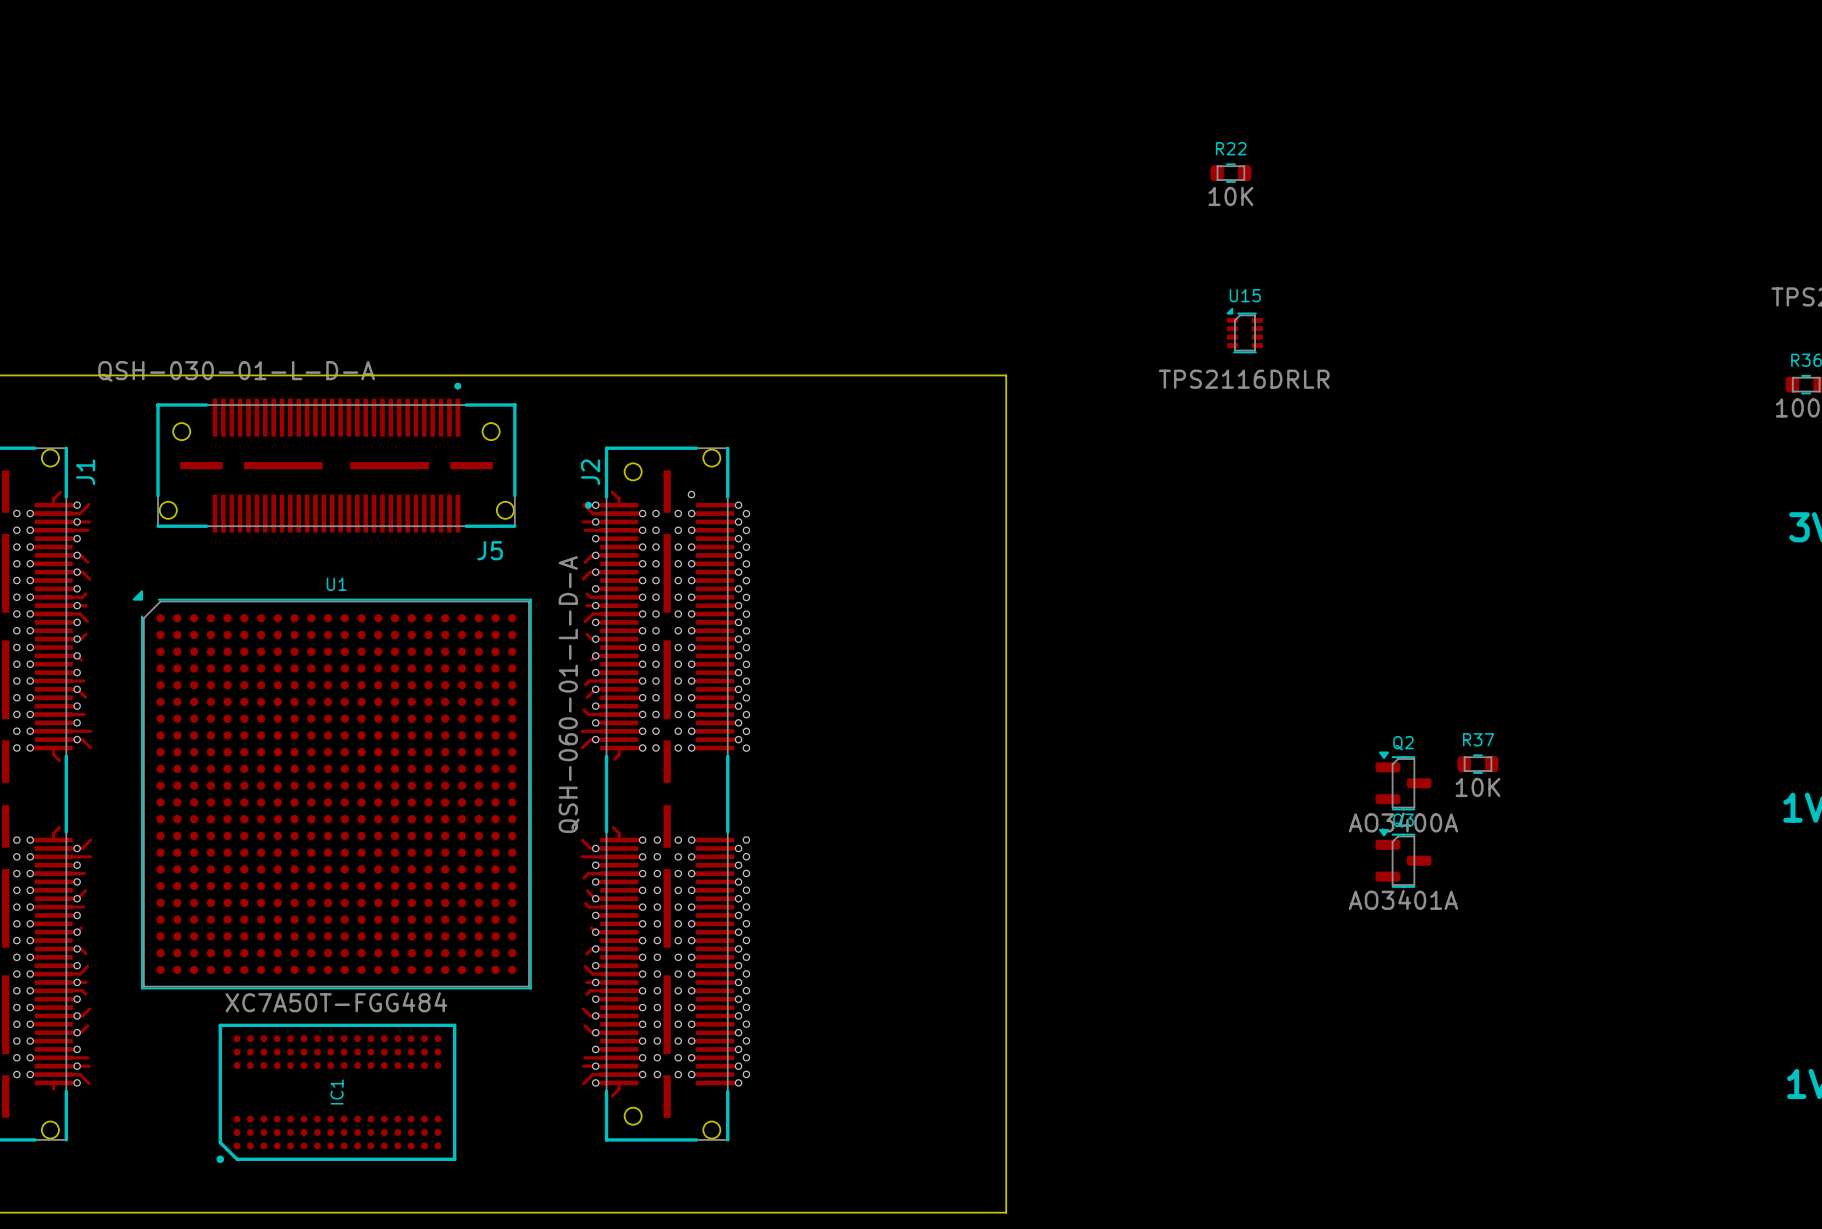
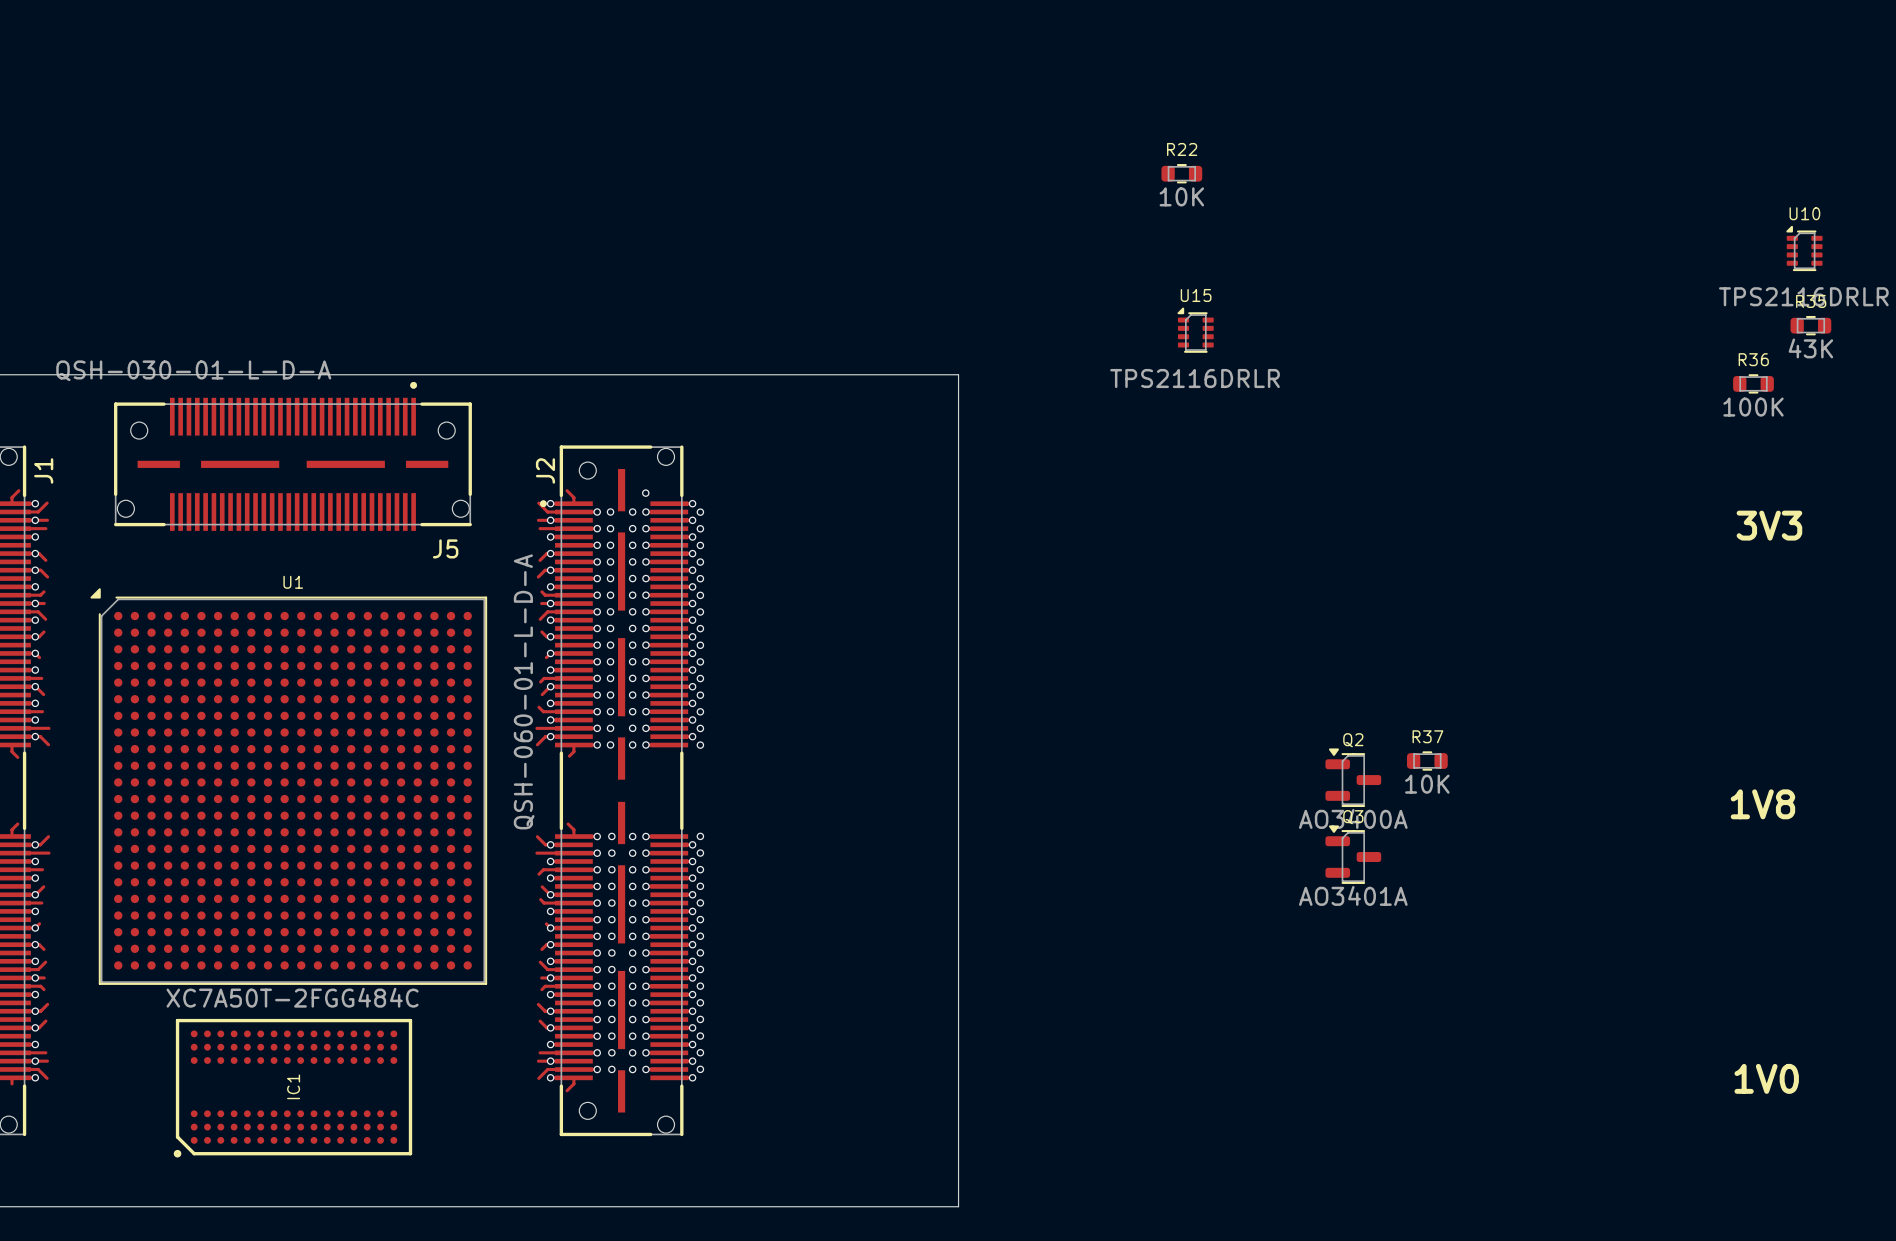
U1 value: XC7A50T-FGG484 (336, 1002) -> XC7A50T-2FGG484C (292, 997)

